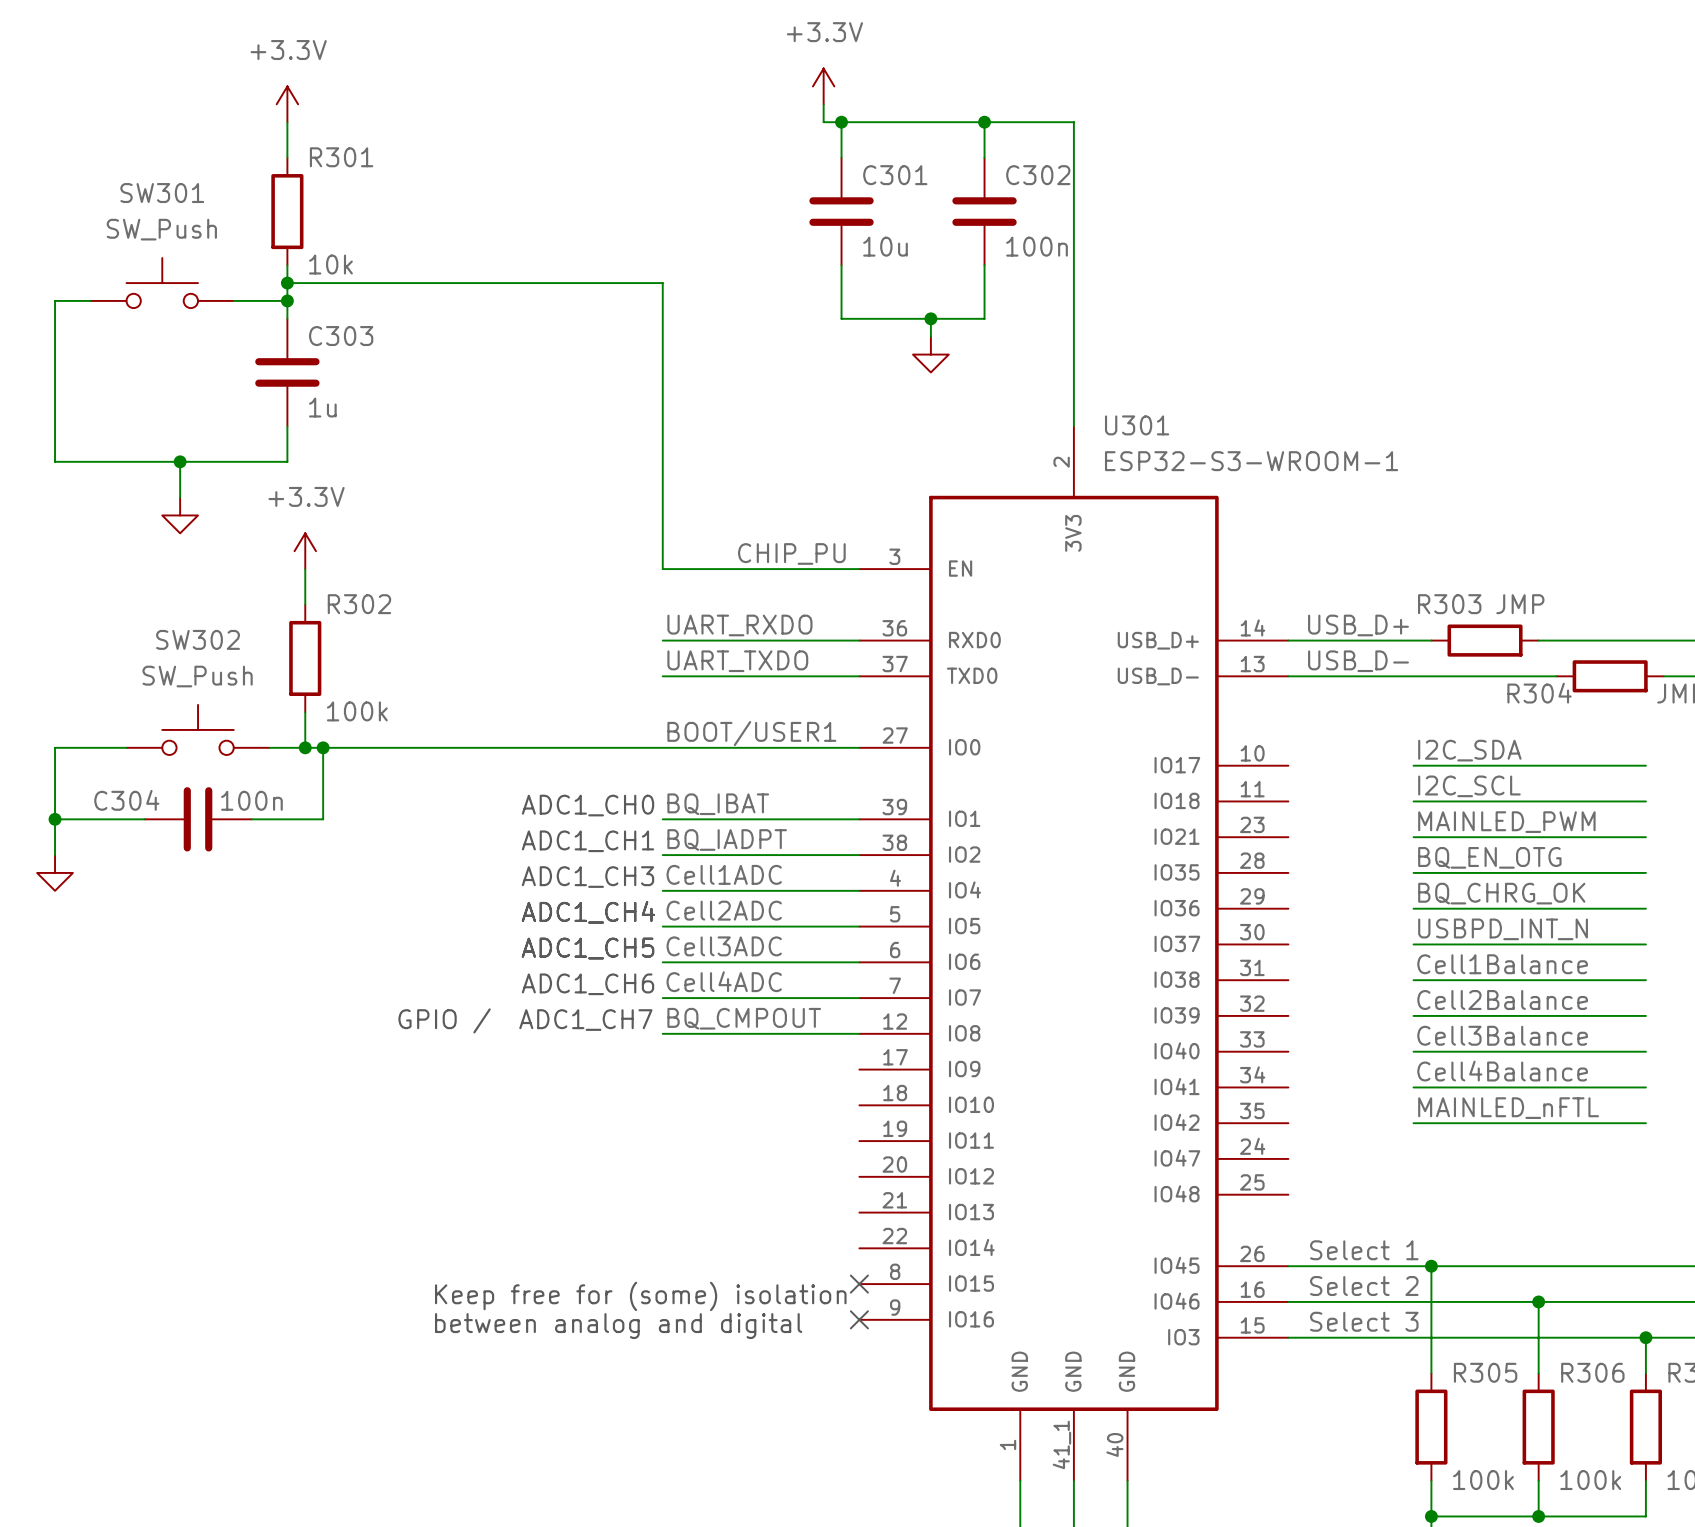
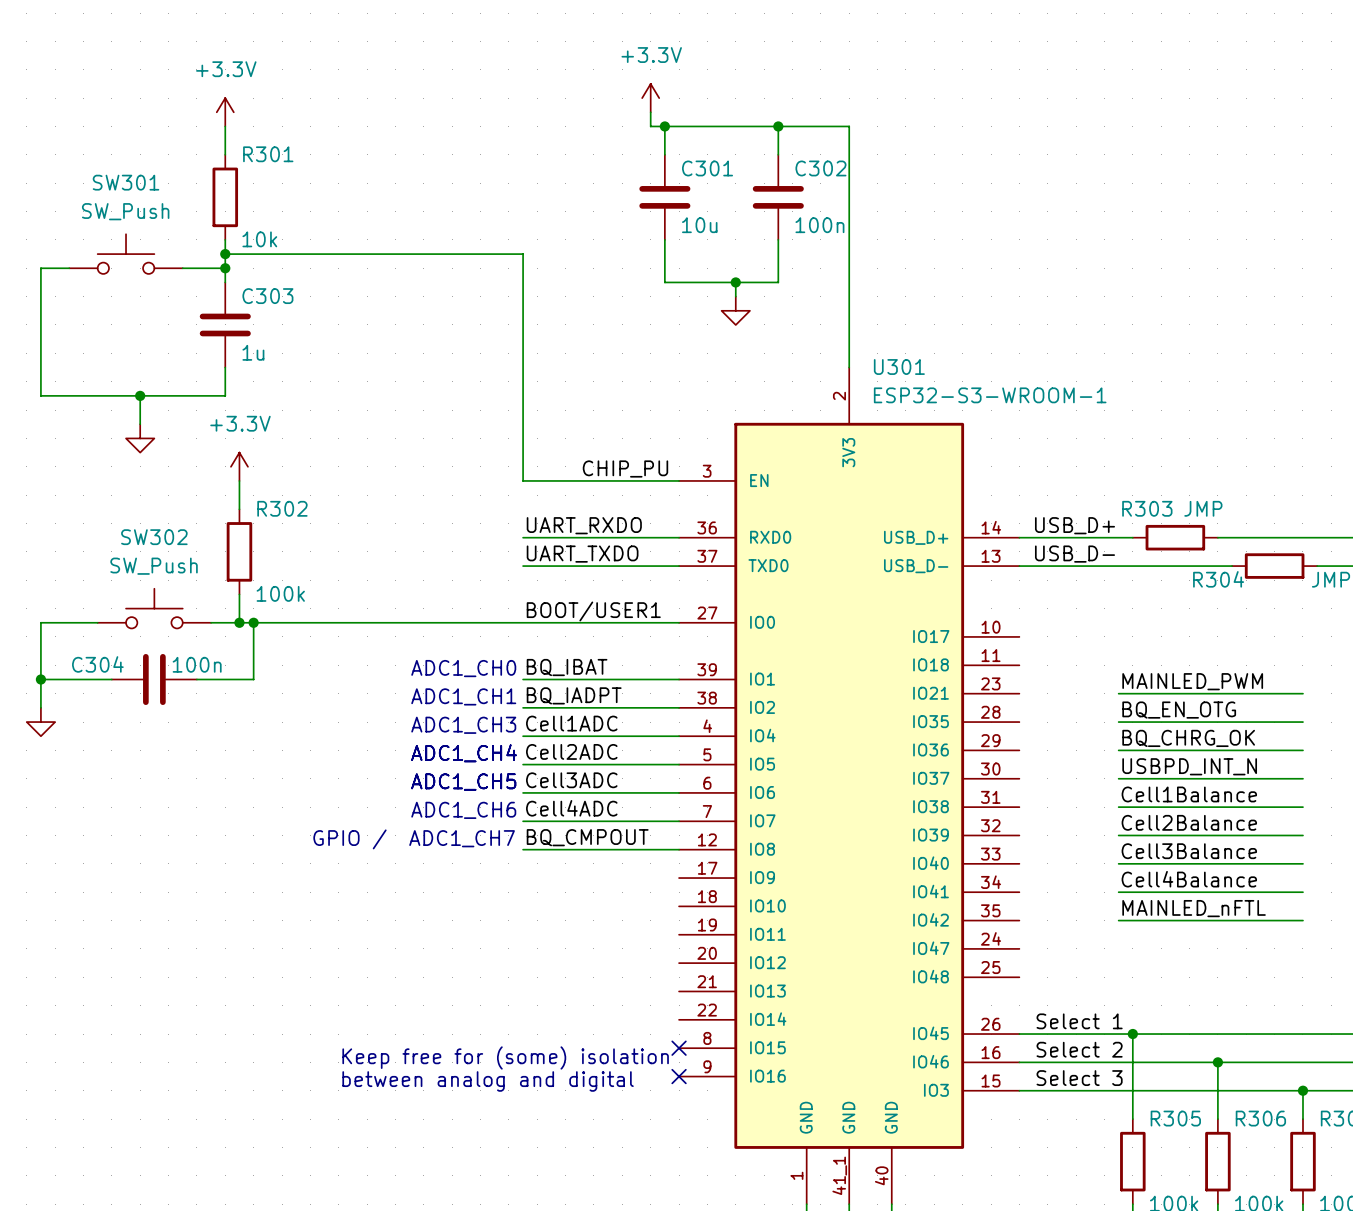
label: I2C_SDA (1469, 750) -> none
wire: (1413, 765) (1645, 765) -> none
label: I2C_SCL (1469, 786) -> none
wire: (1413, 801) (1645, 801) -> none

